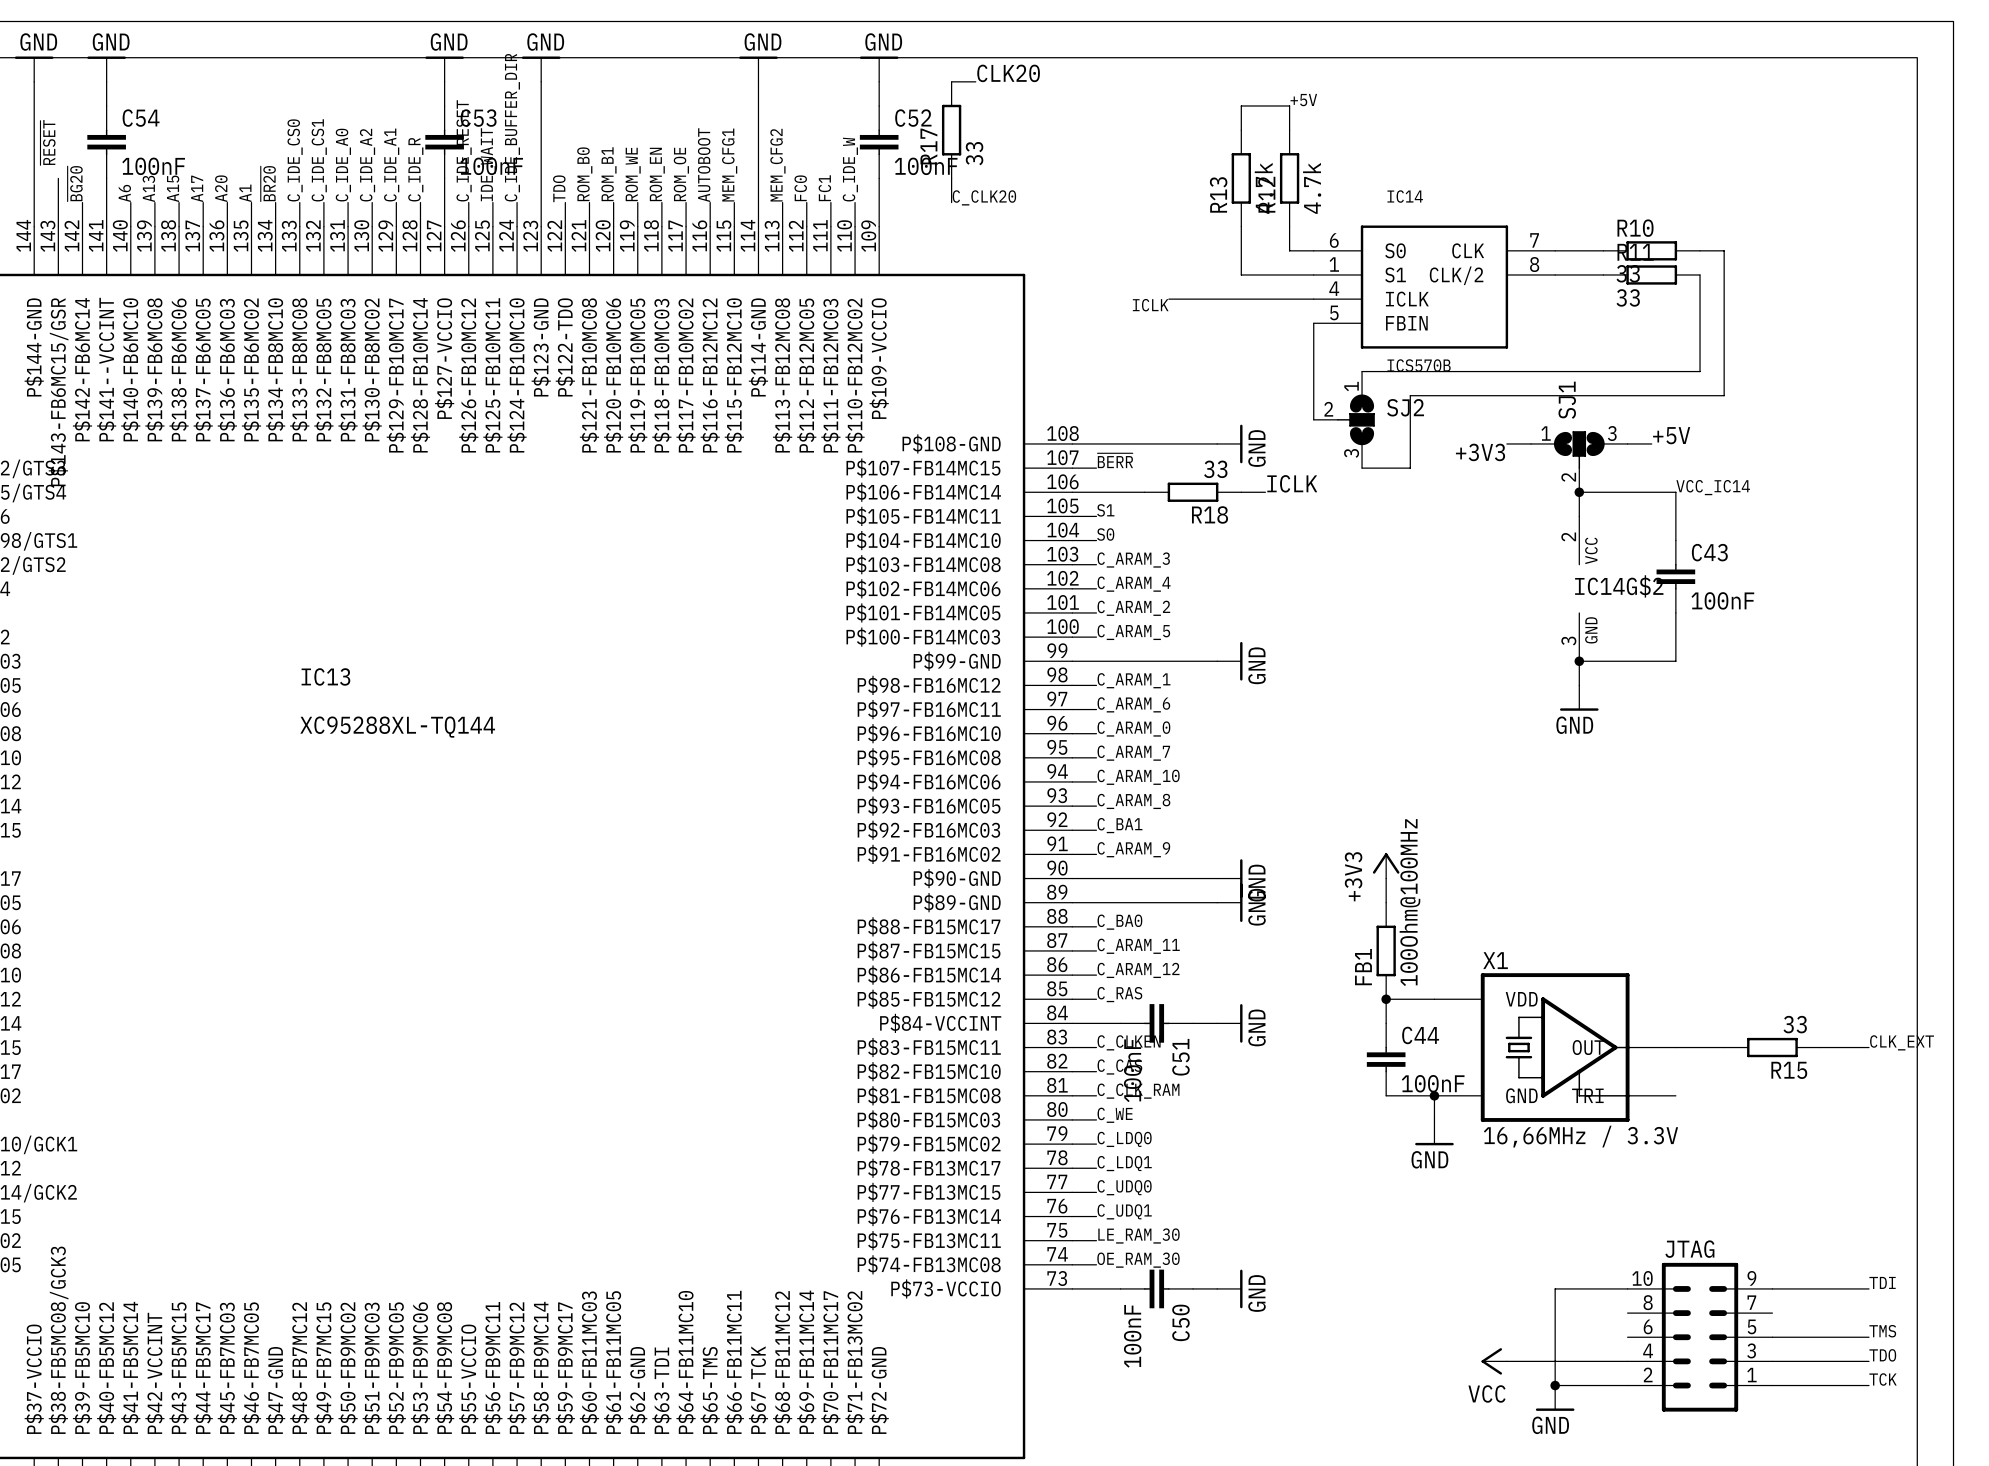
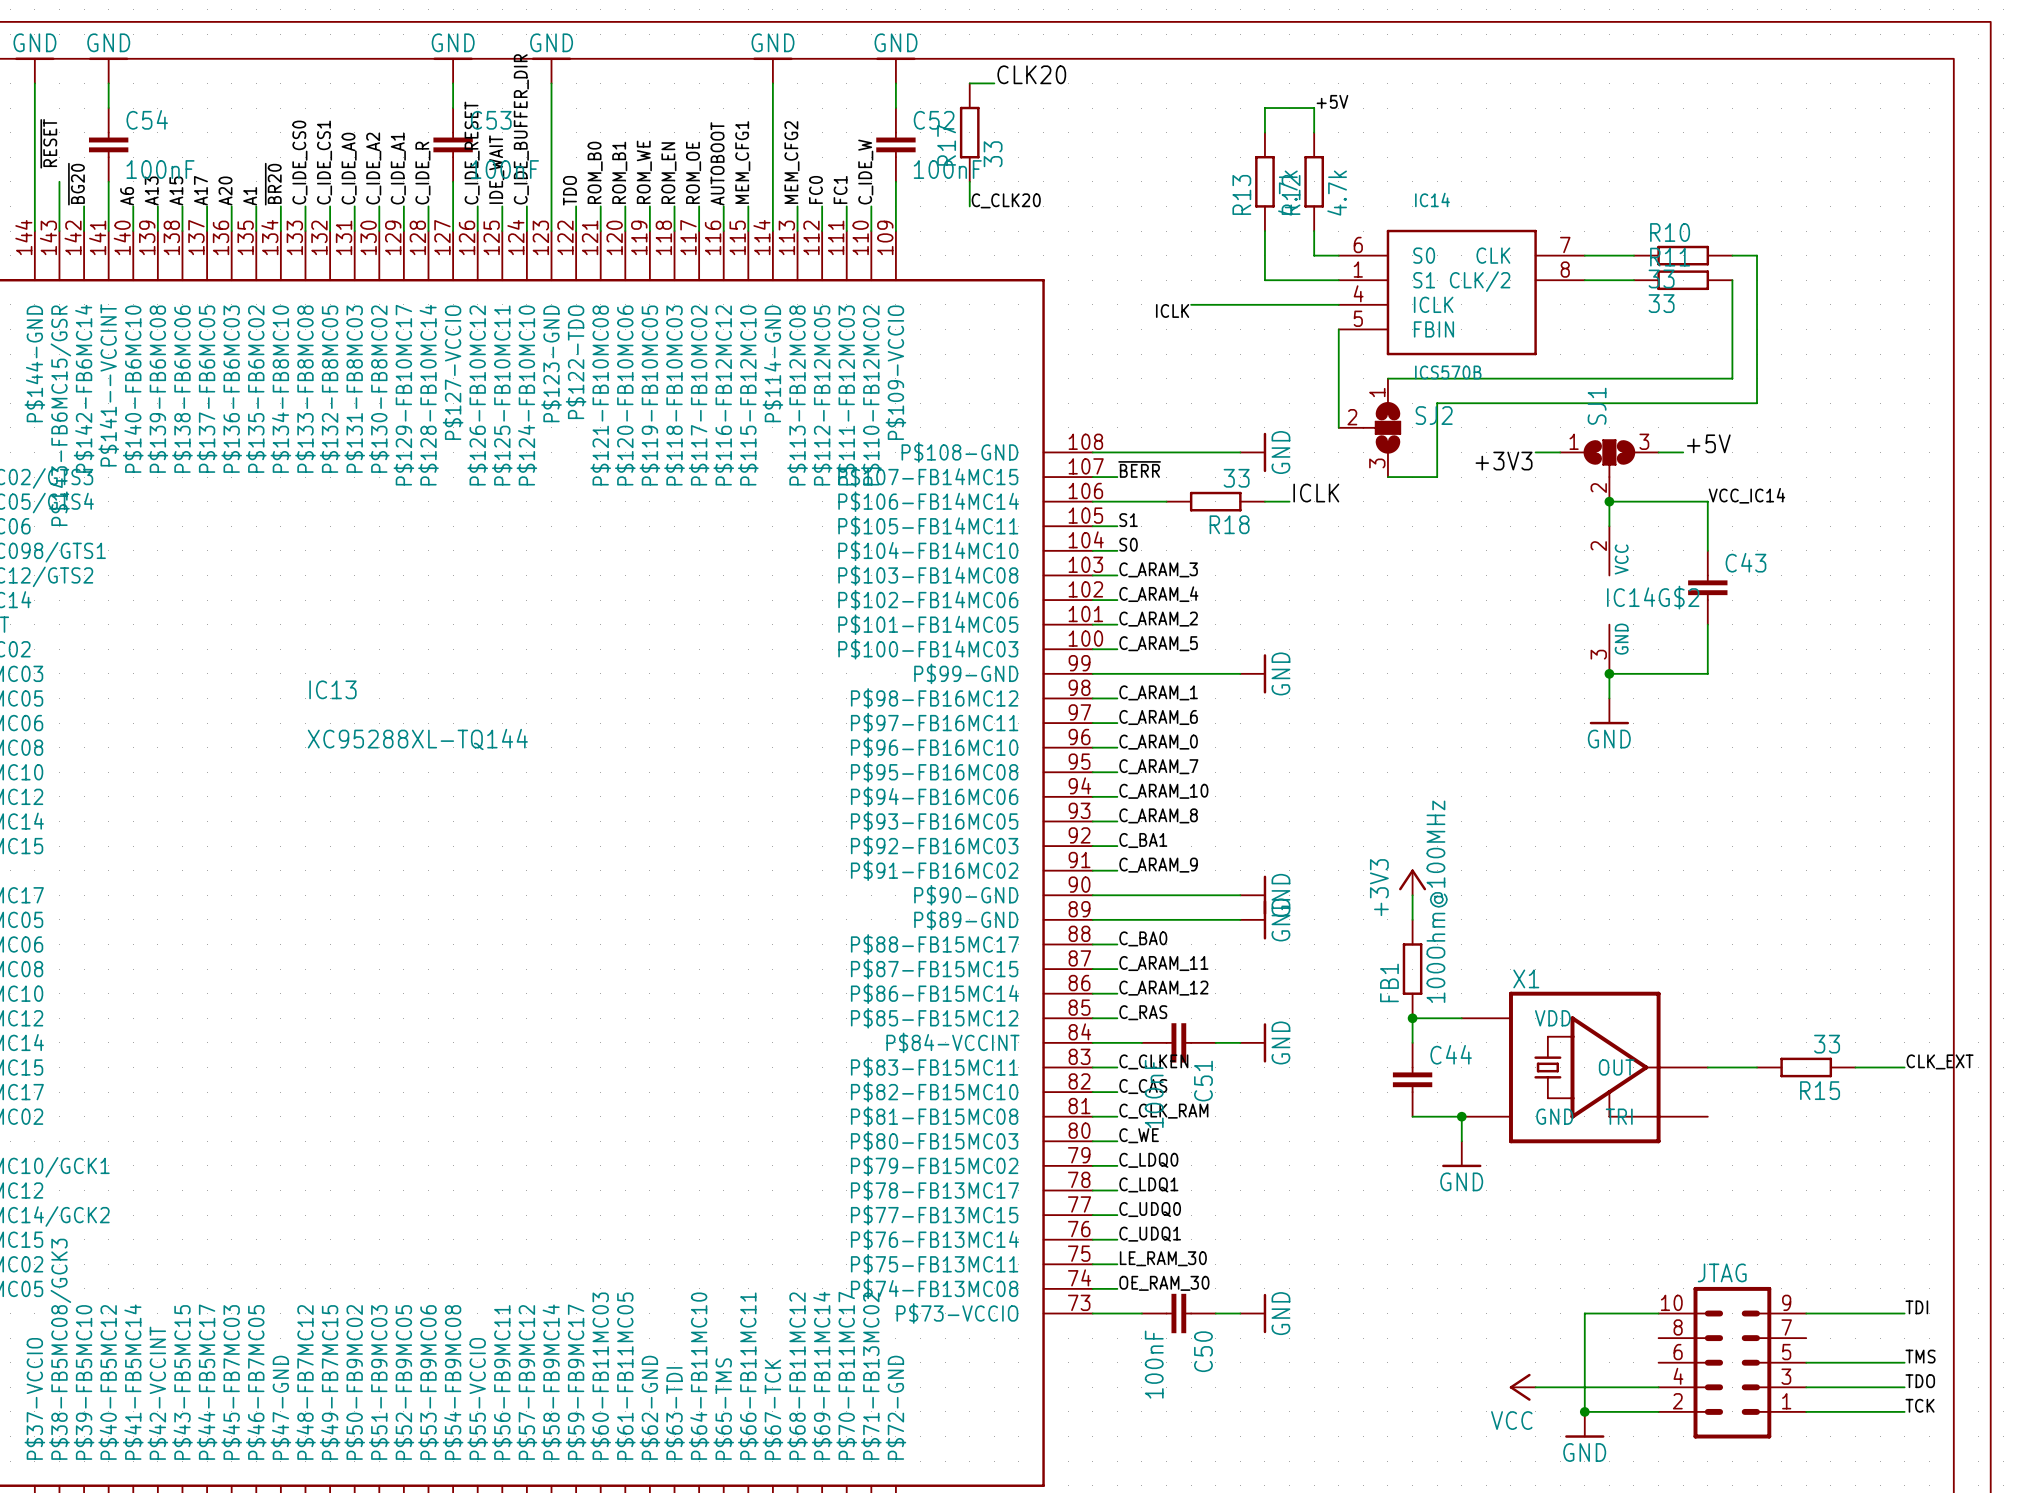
C43 value: 100nF (1722, 600) -> none
C44 value: 100nF (1433, 1083) -> none
X1 value: 16,66MHz / 3.3V (1580, 1136) -> none

